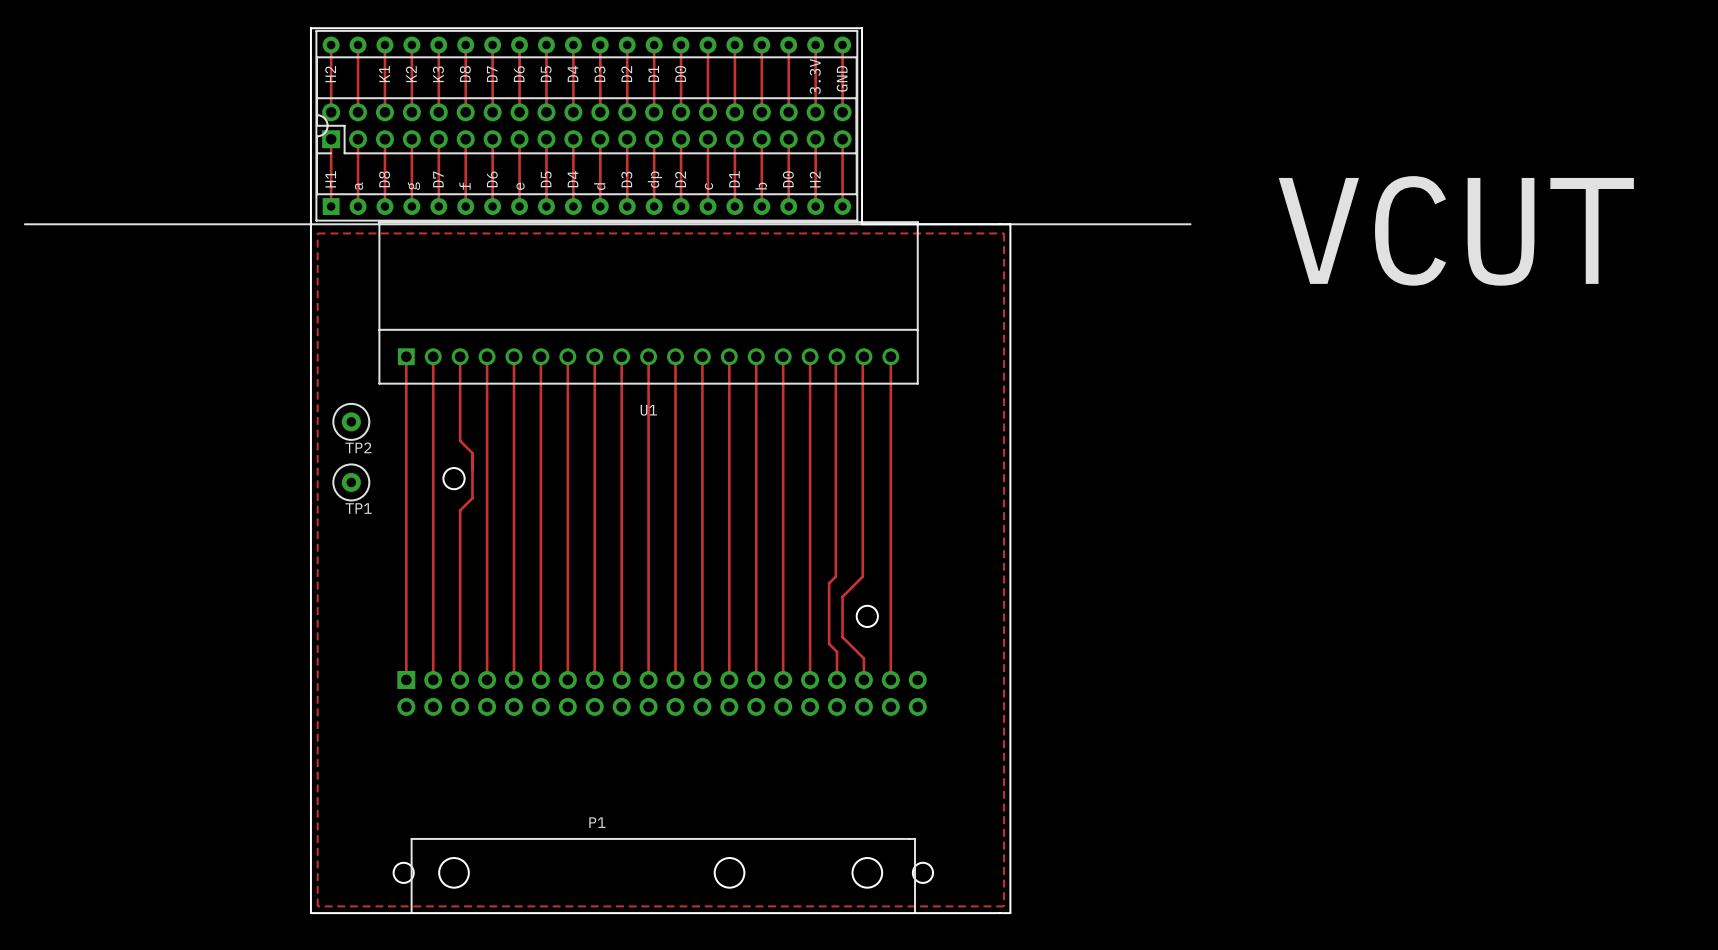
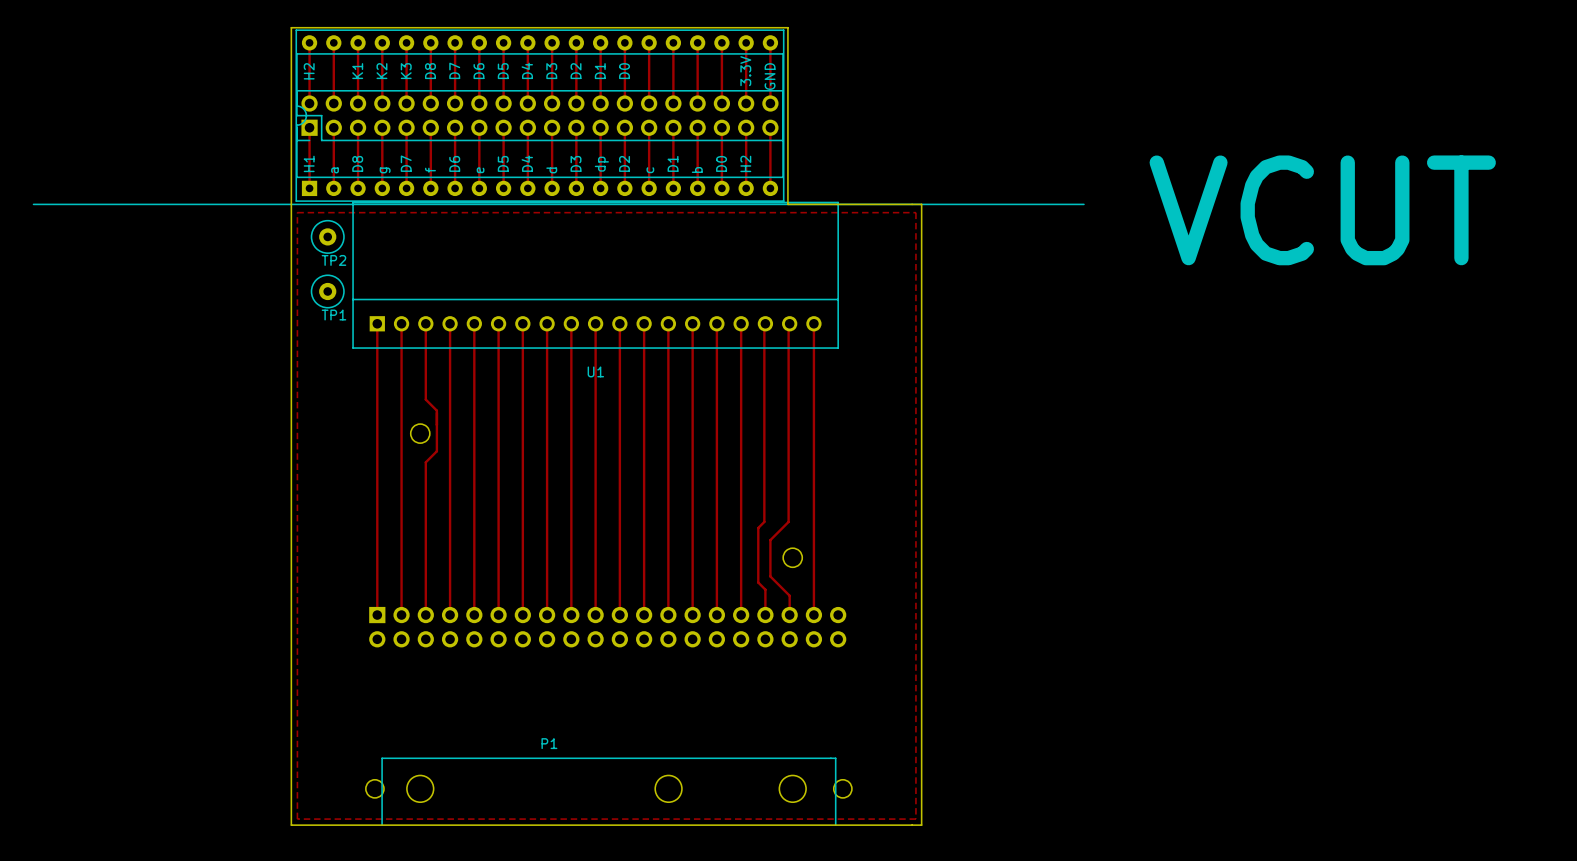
TP2 position: (351, 421) -> (327, 236)
TP1 position: (351, 482) -> (327, 291)

